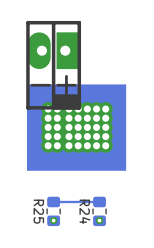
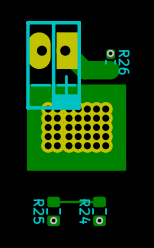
track: none -> (65, 50) (84, 70) (110, 70)
via: none -> (110, 53)
R26: none -> (110, 62)

